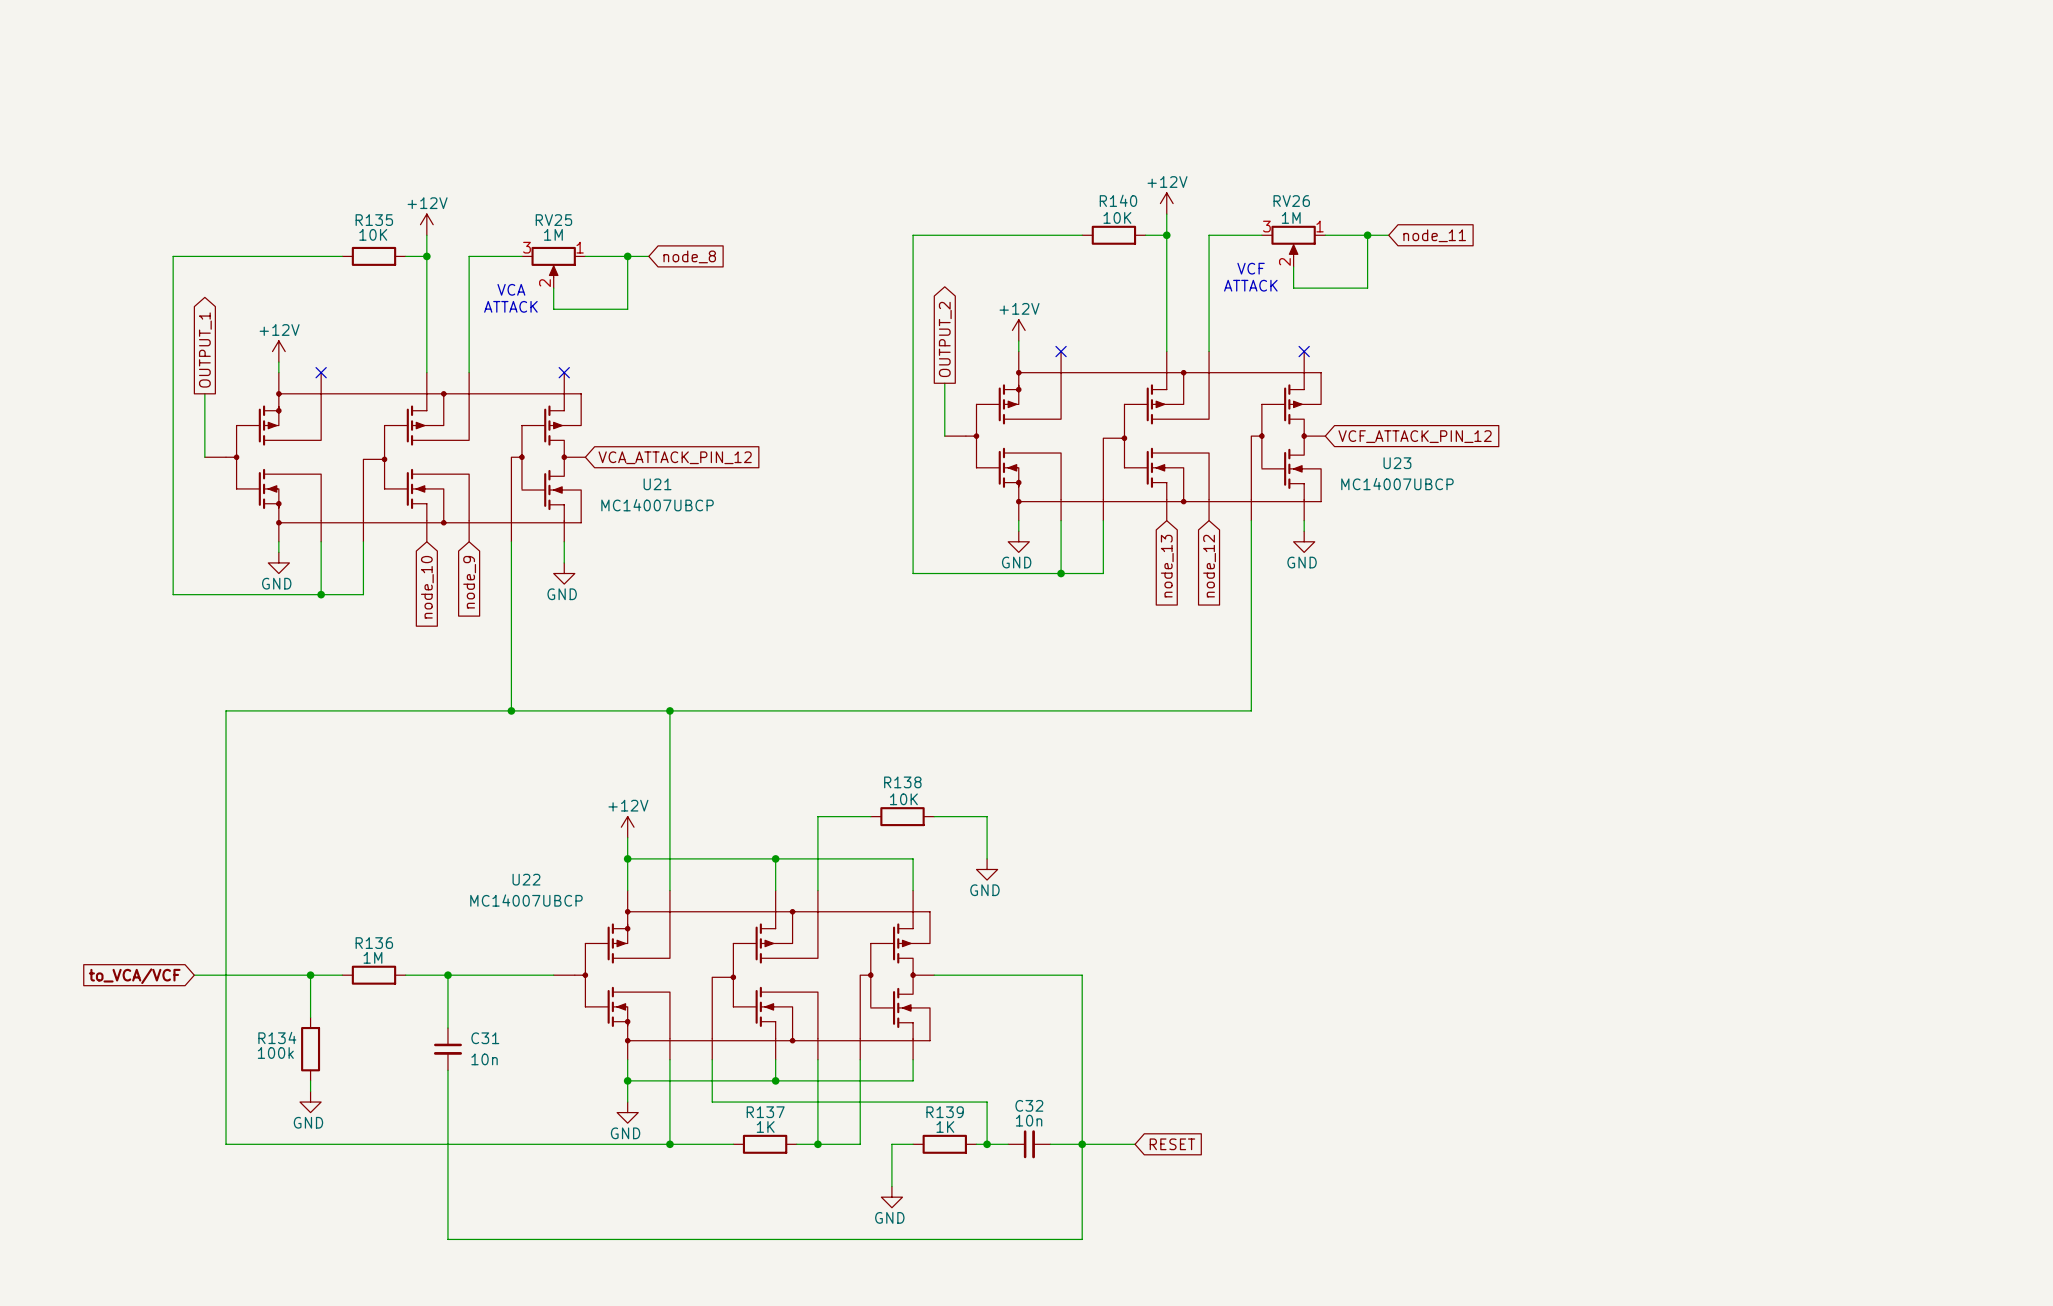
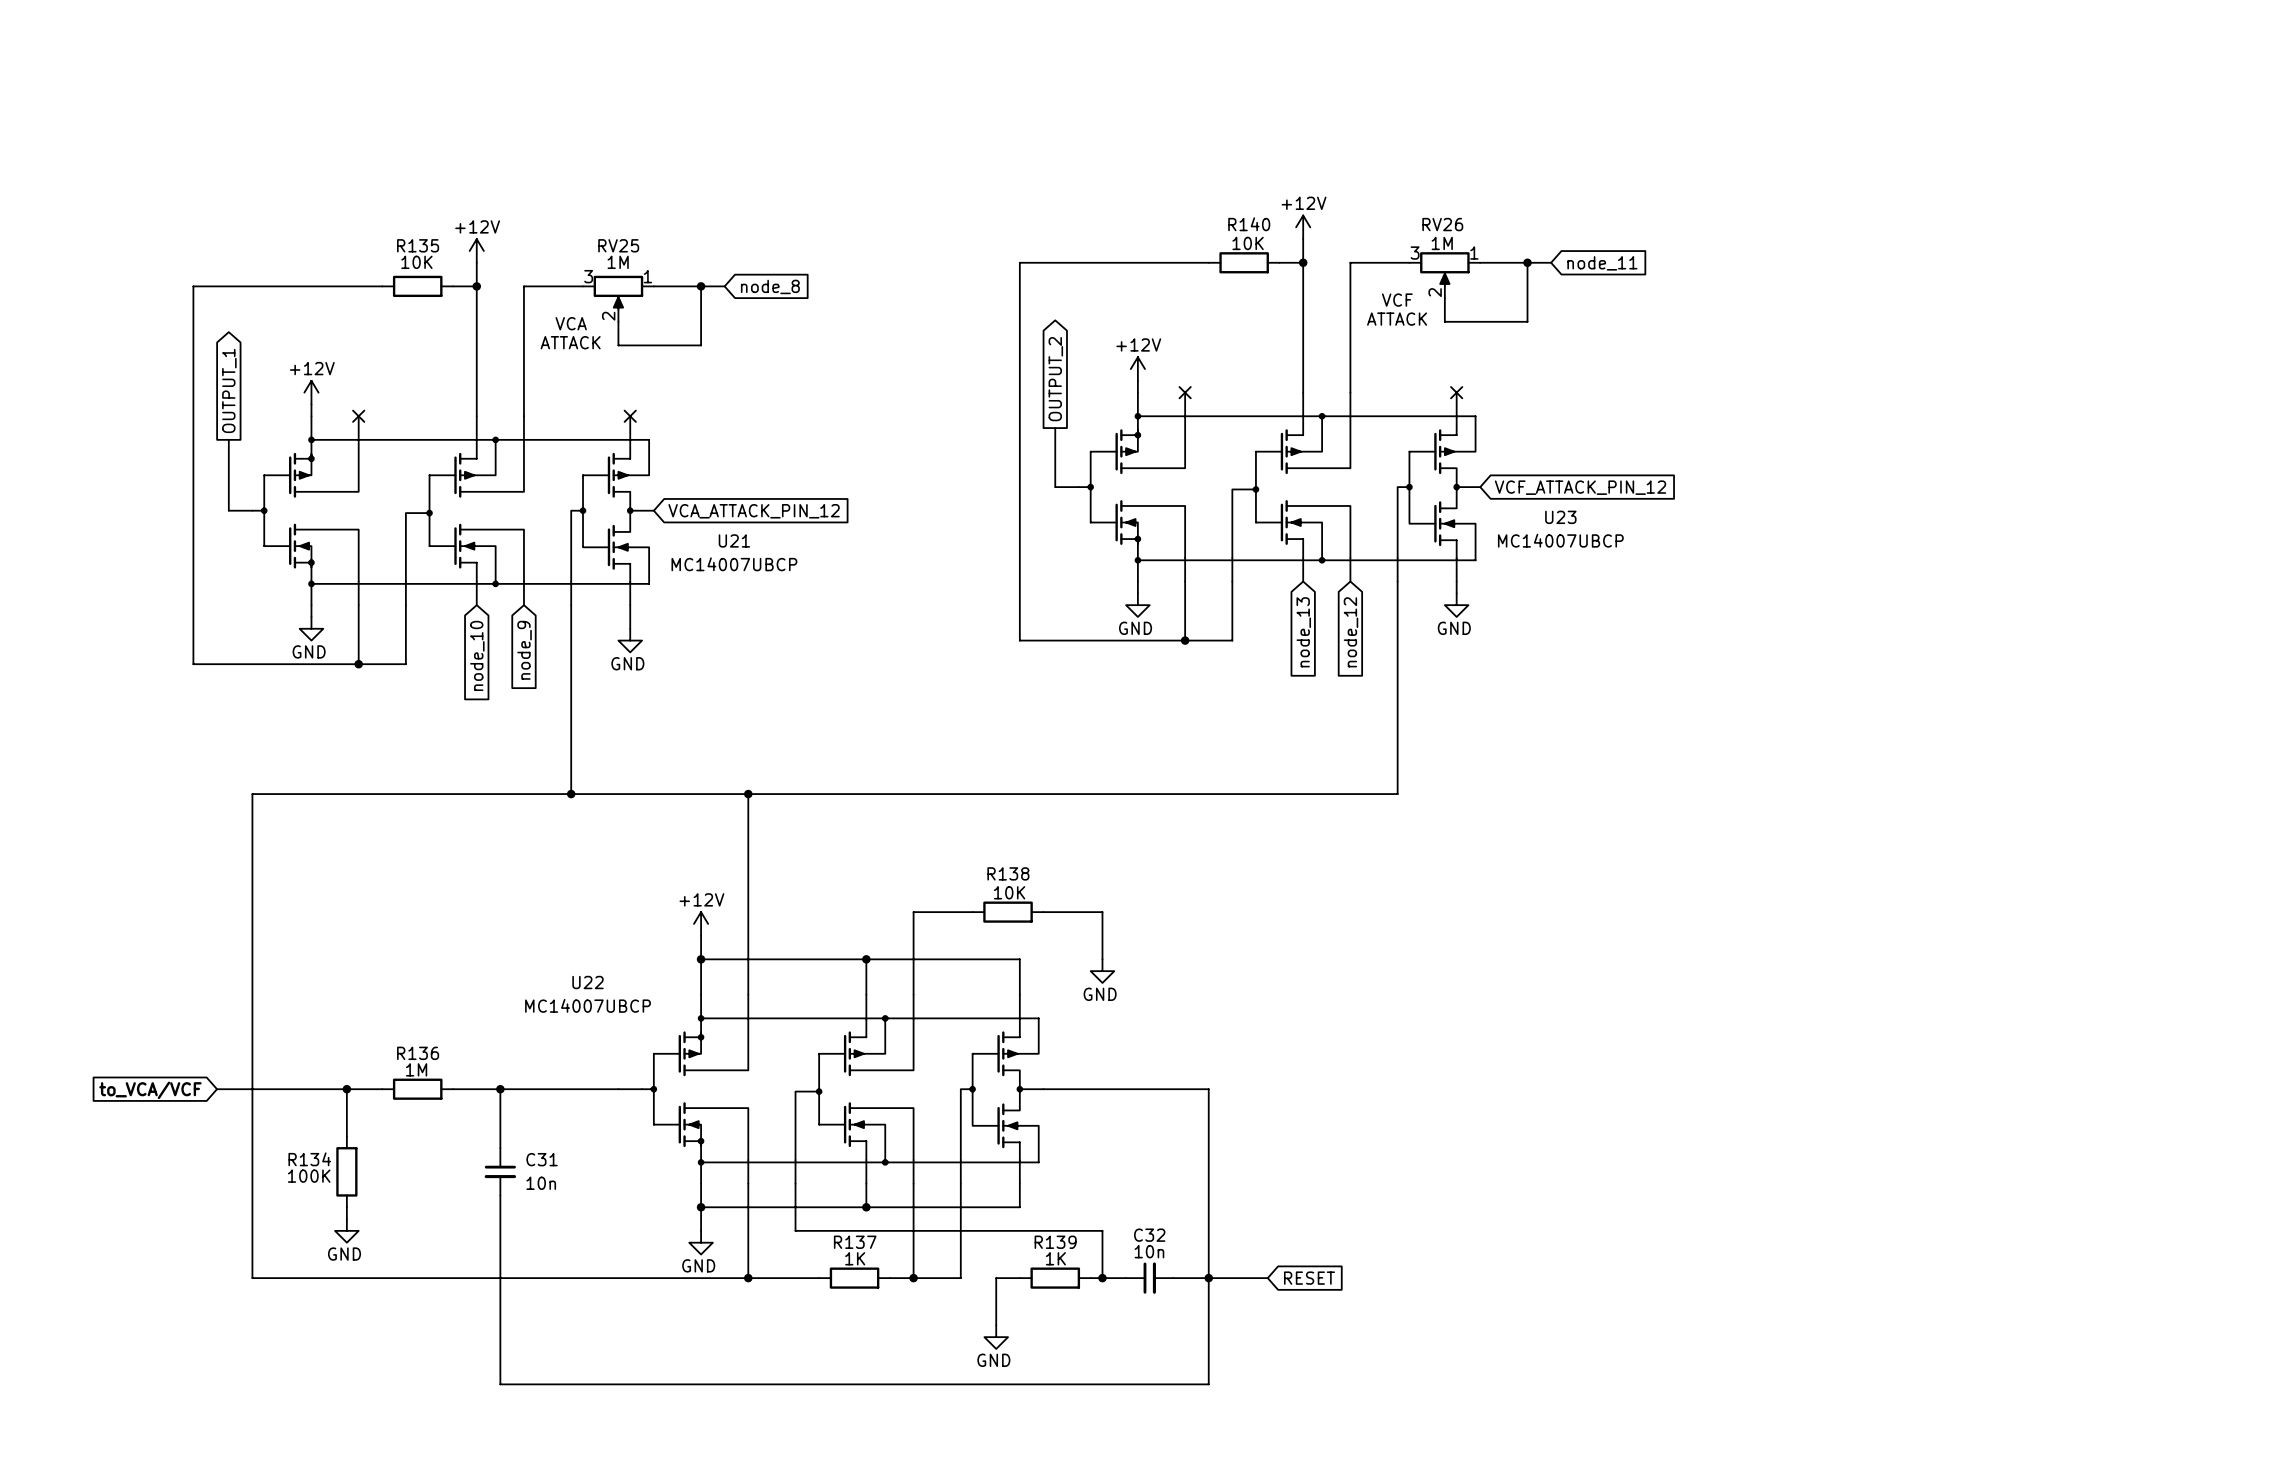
R134 value: 100k (275, 1053) -> 100K (309, 1176)

